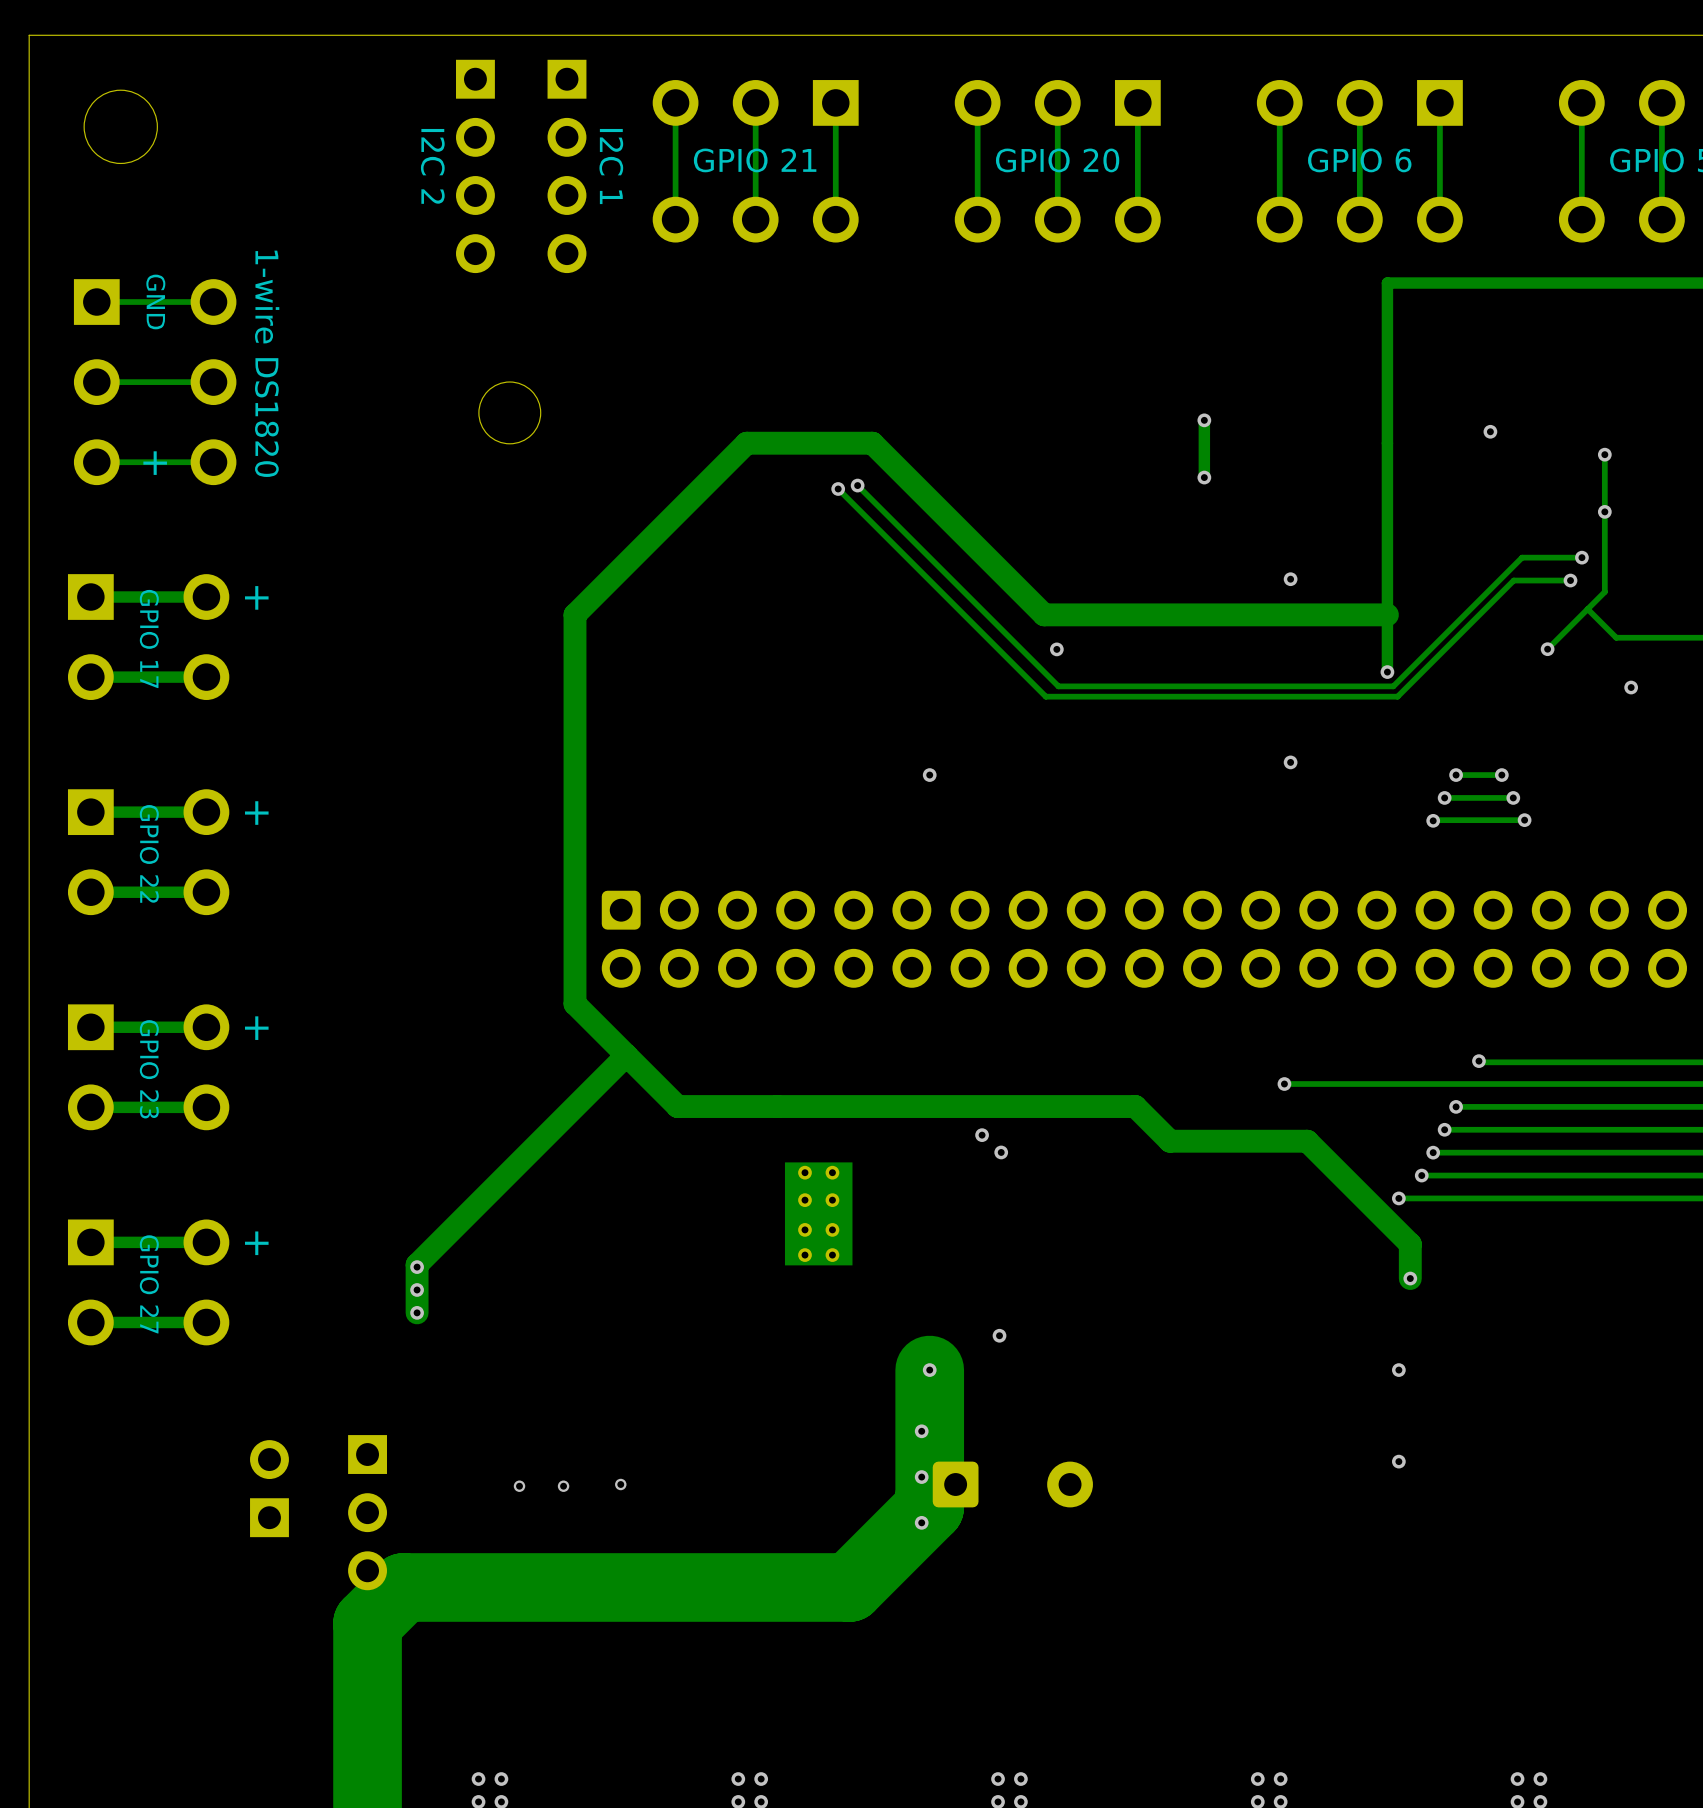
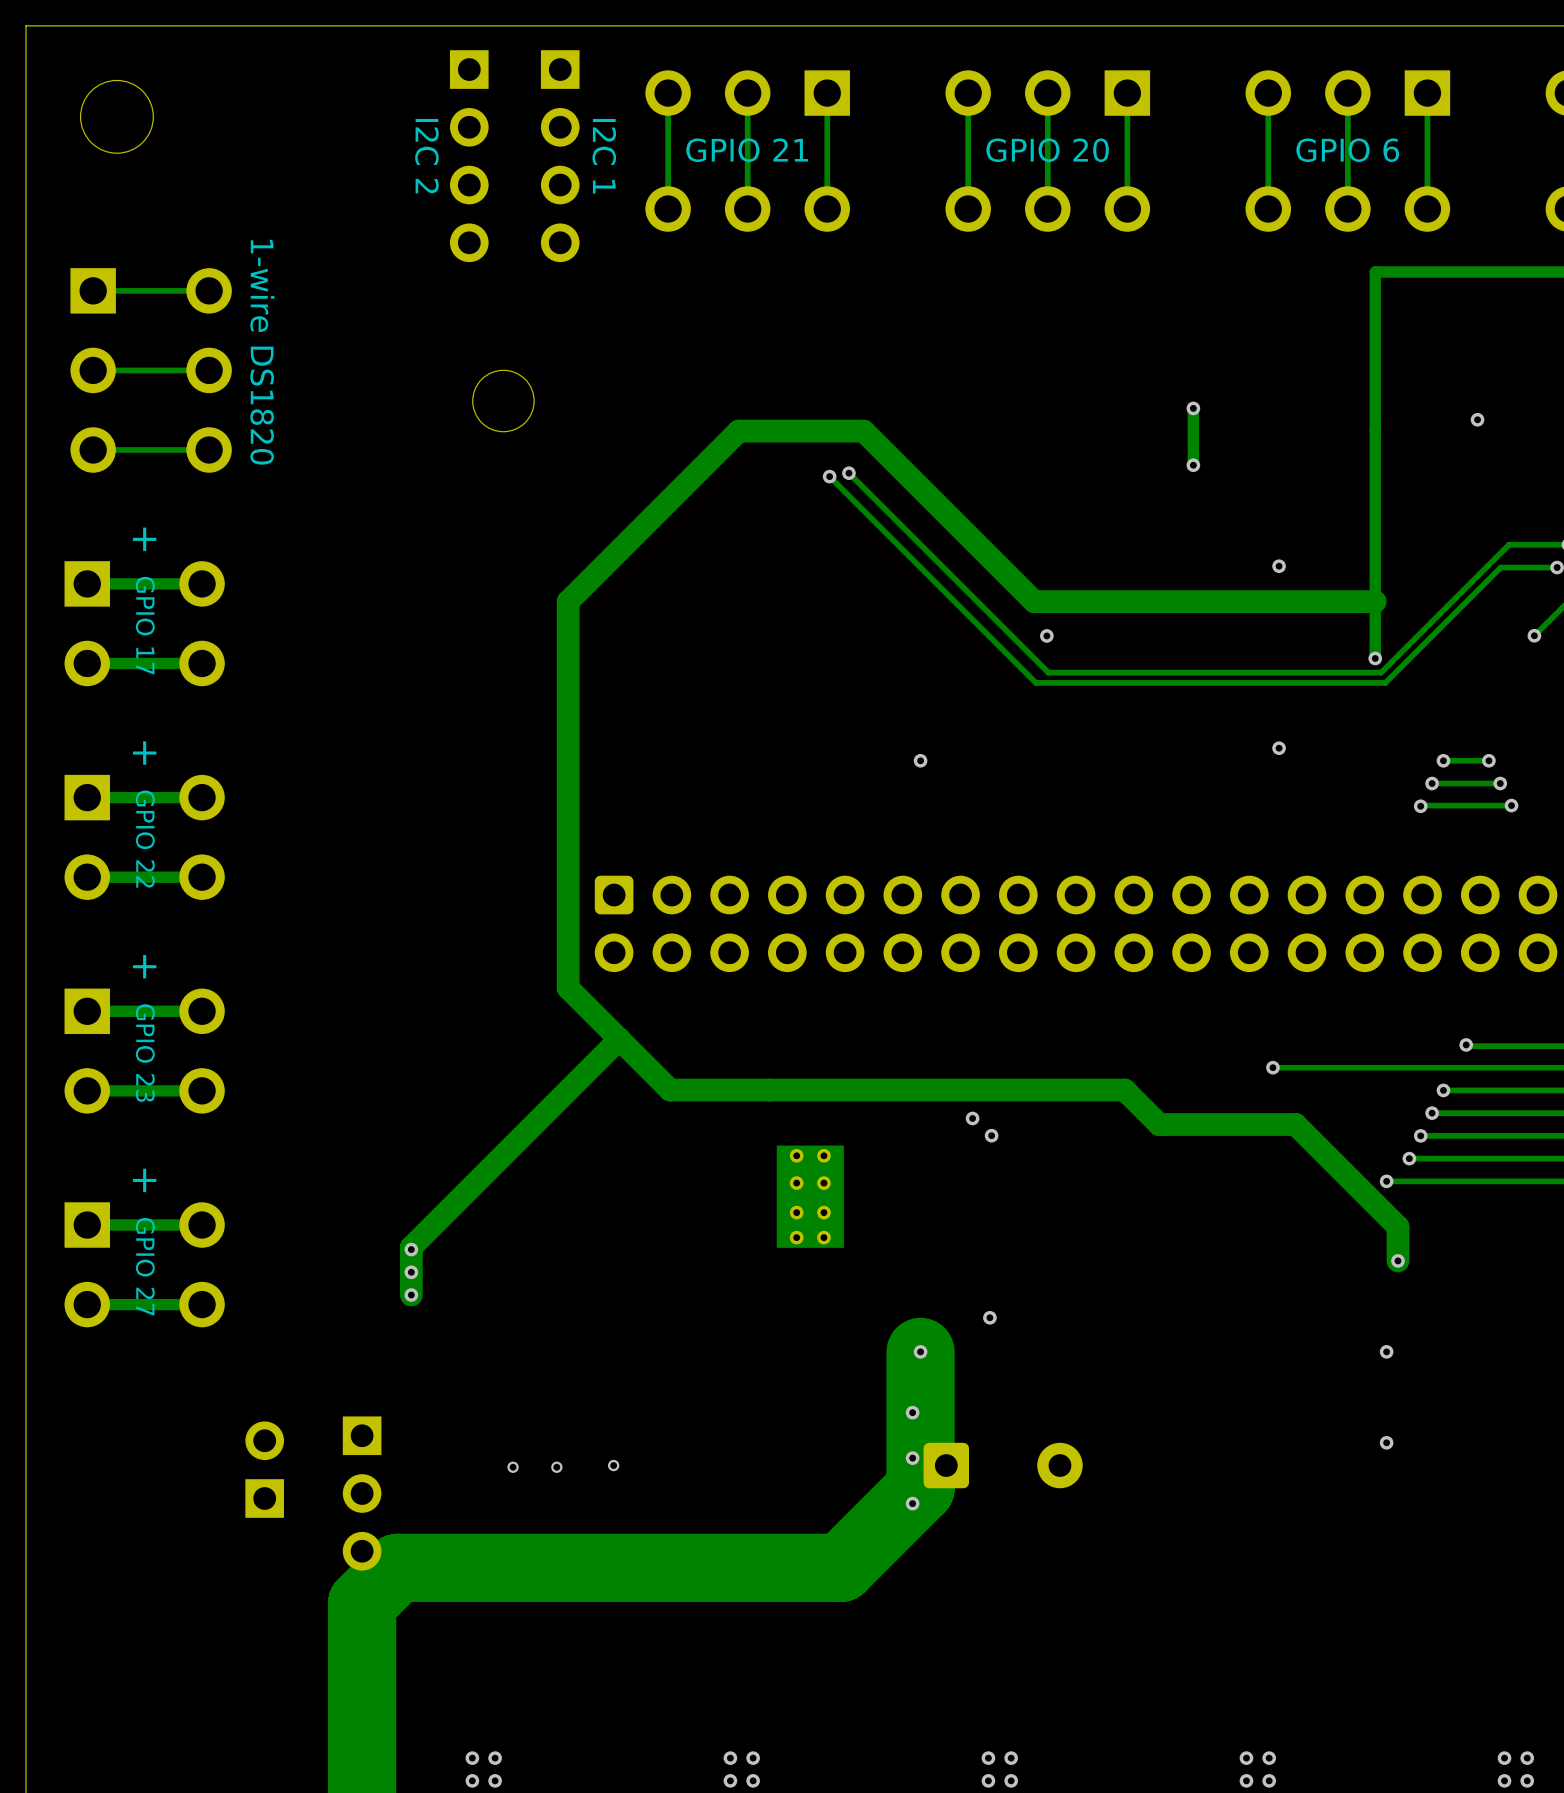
text: GND (155, 301) -> none
text: + (155, 463) -> none
text: none -> + (144, 539)
text: + (256, 597) -> none
text: none -> + (144, 753)
text: + (256, 813) -> none
text: none -> + (144, 966)
text: + (256, 1028) -> none
text: none -> + (144, 1180)
text: + (256, 1243) -> none

